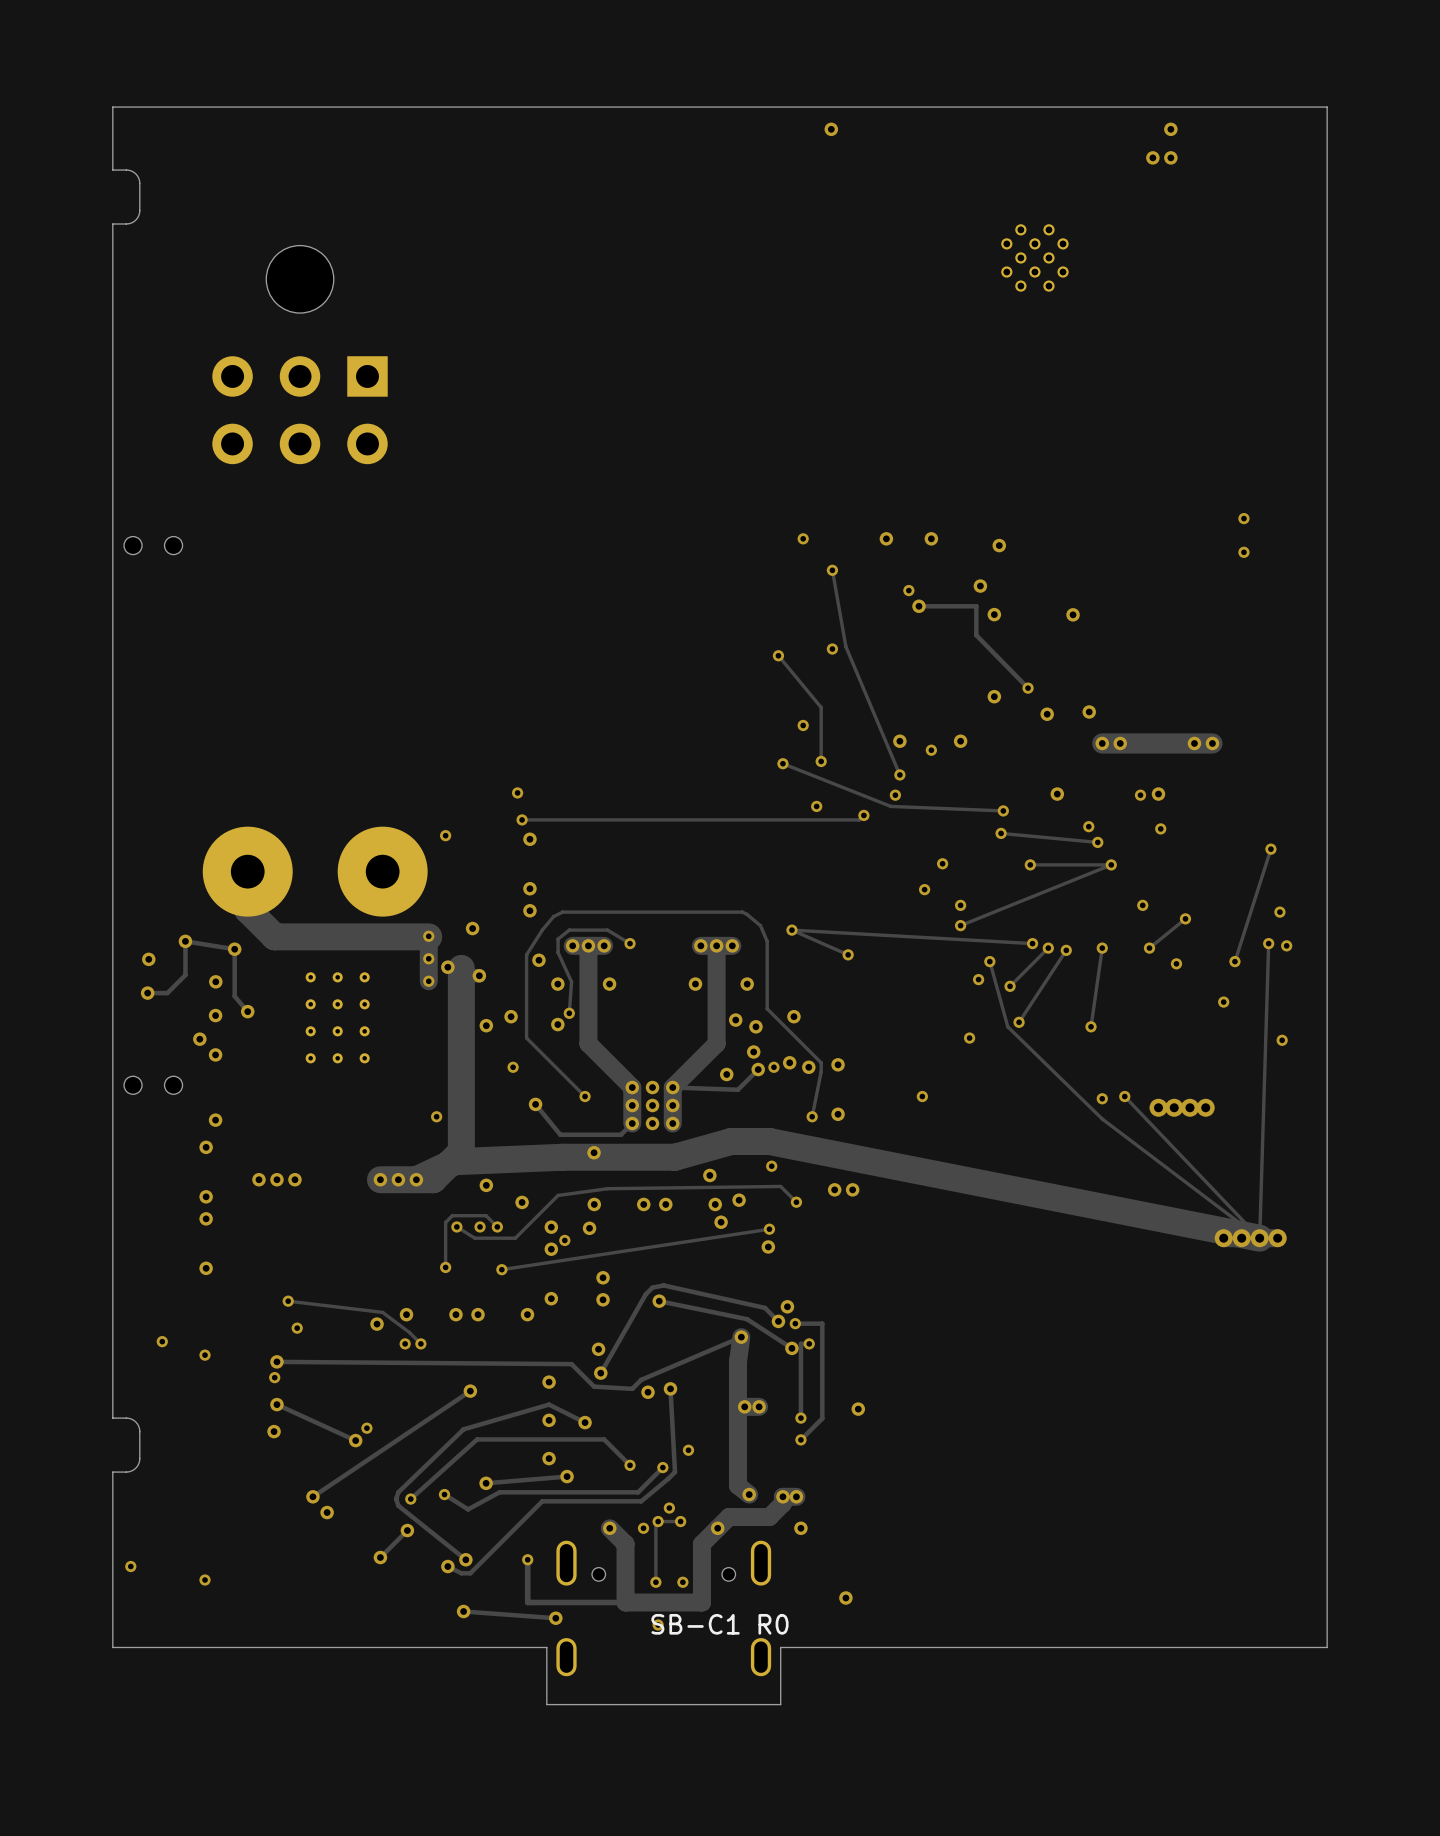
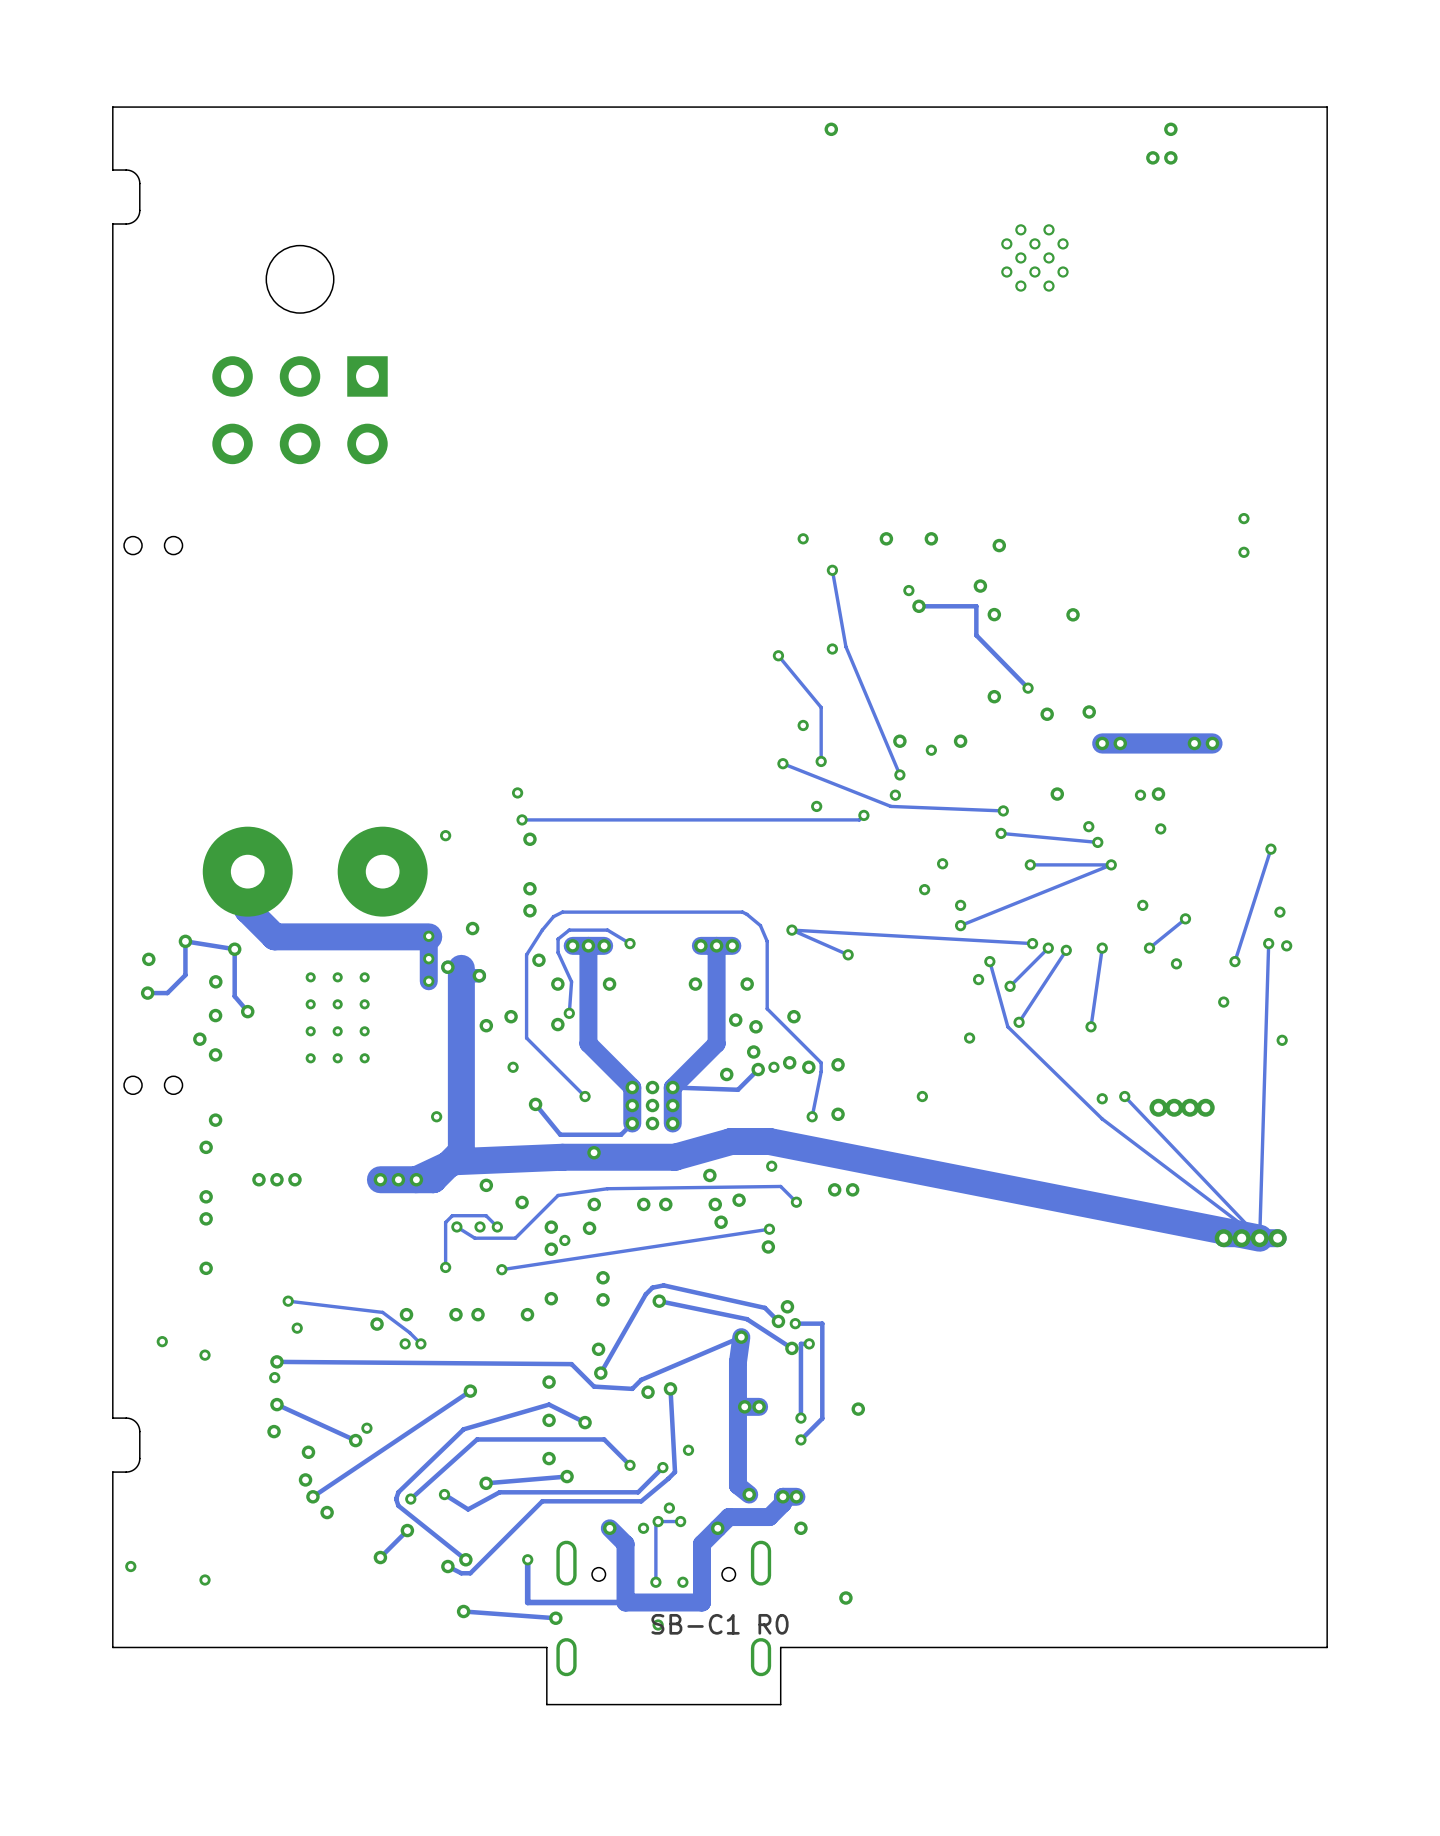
via: none -> (308, 1452)
via: none -> (305, 1479)

